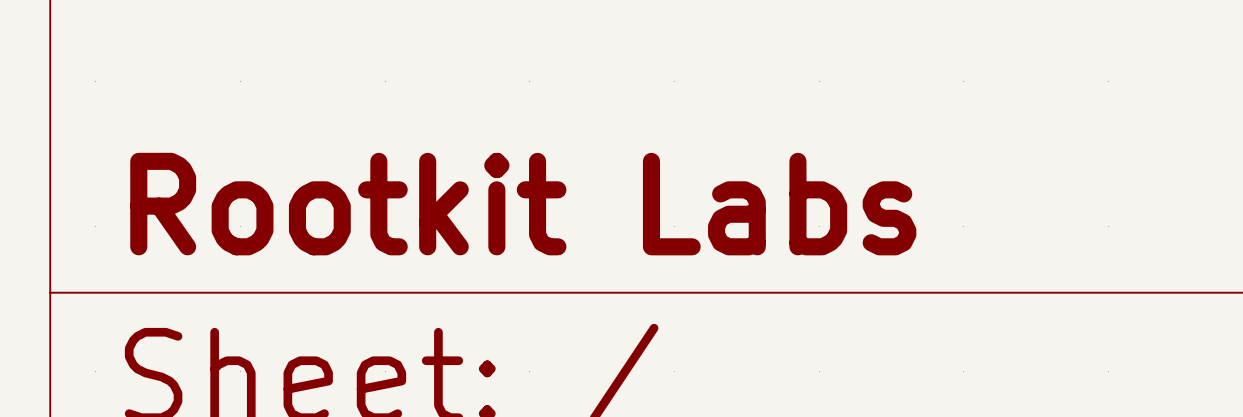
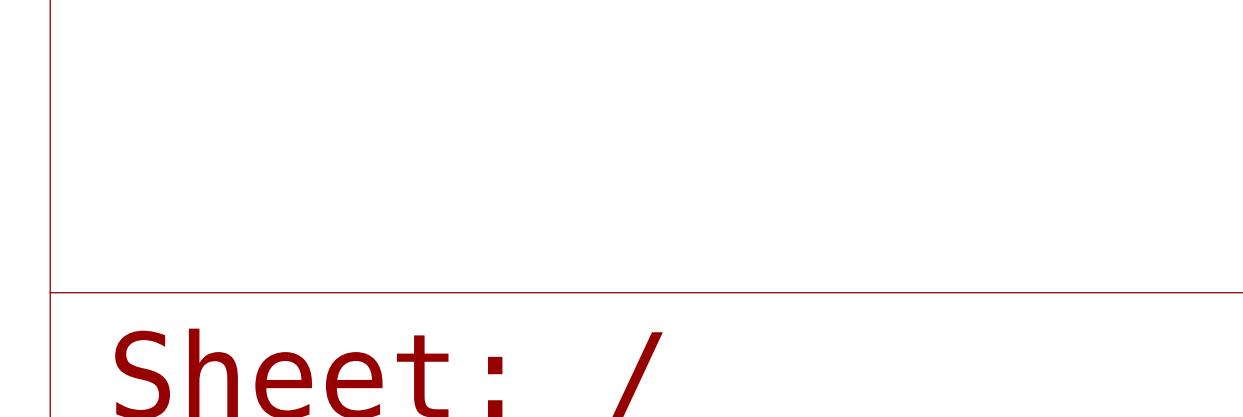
title block: Rootkit Labs (523, 204) -> none

